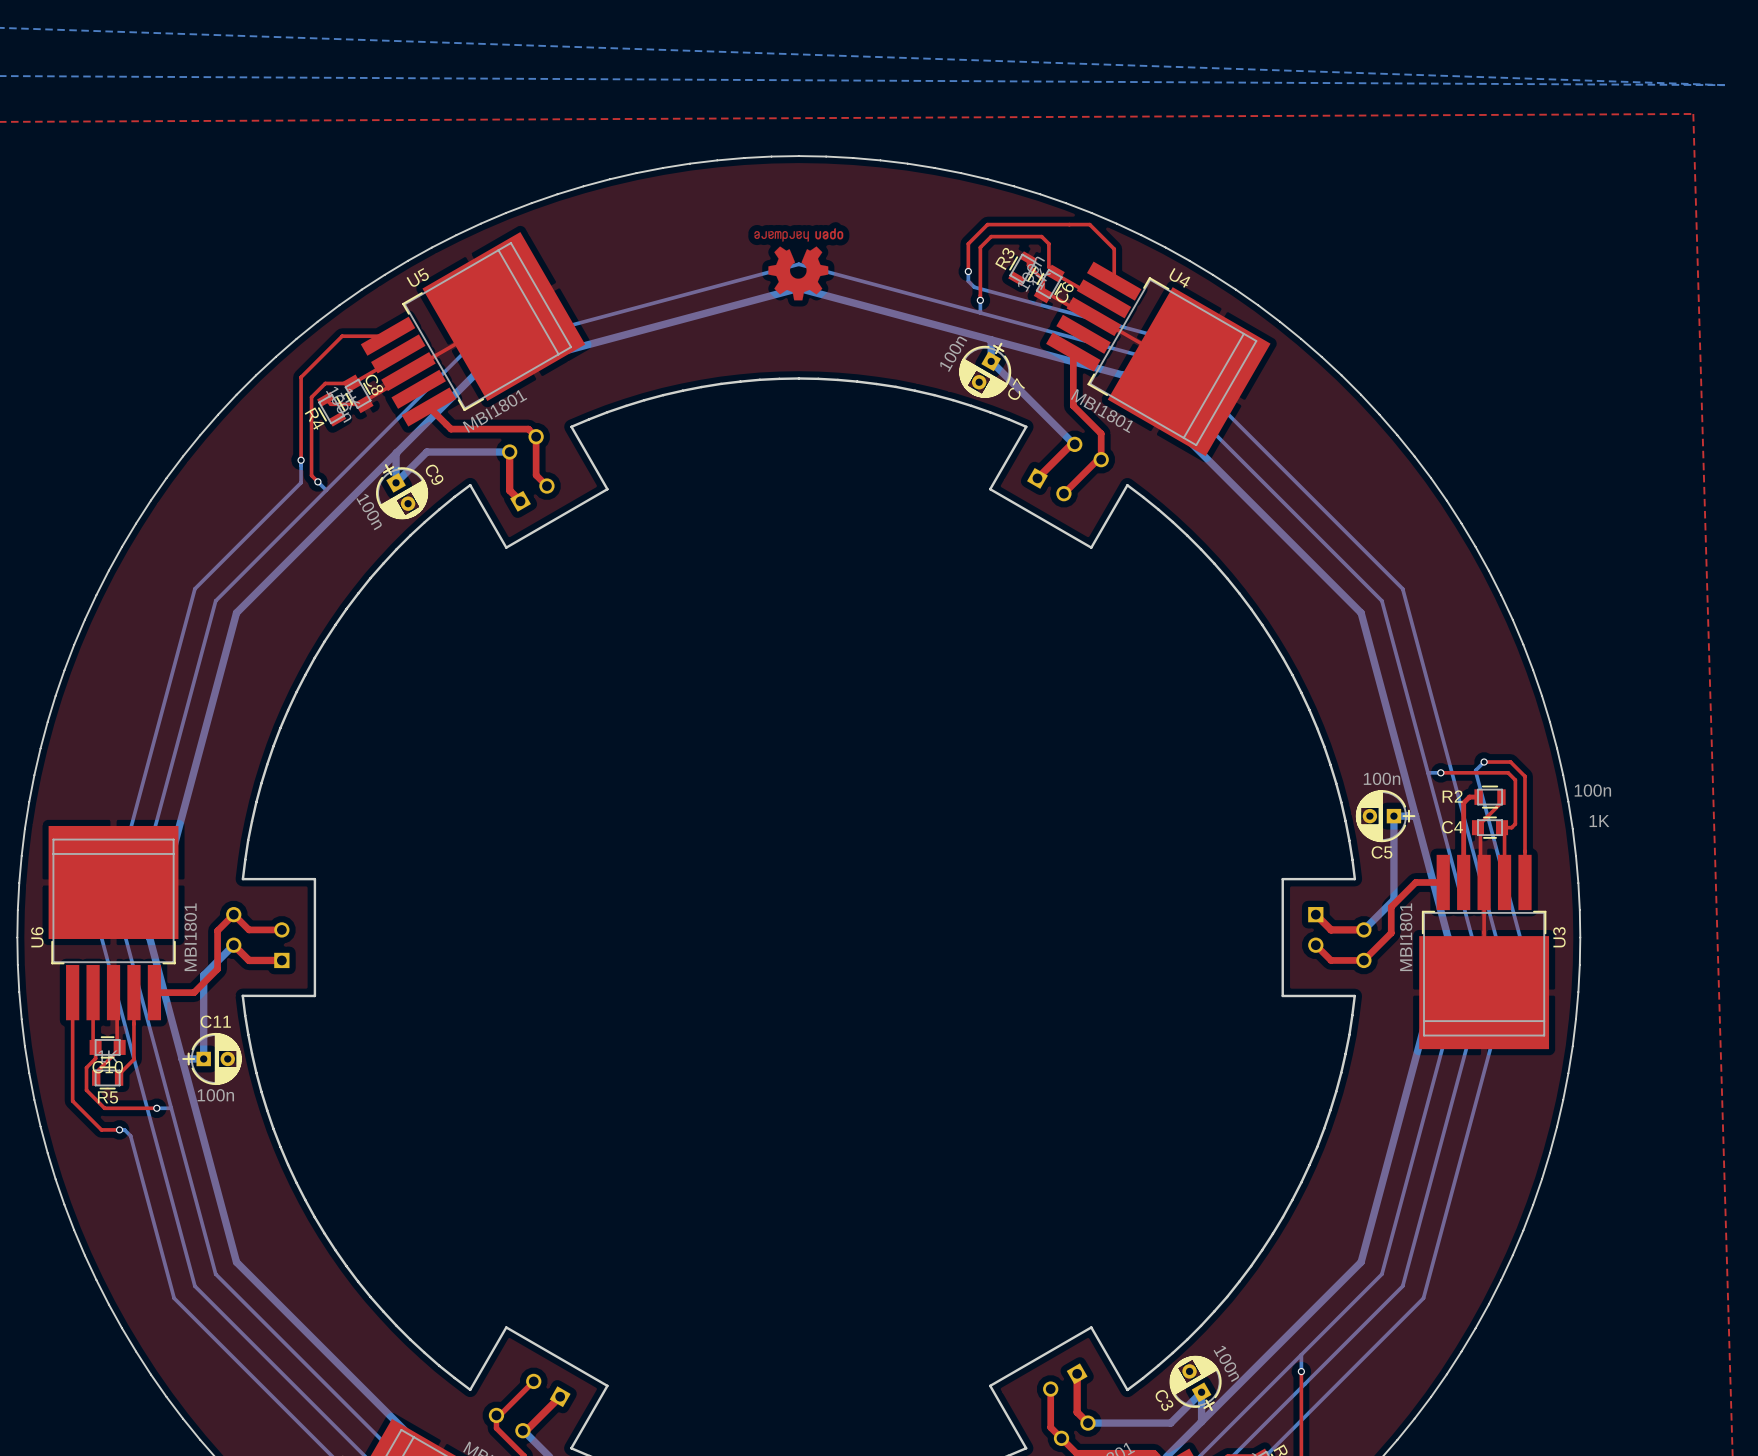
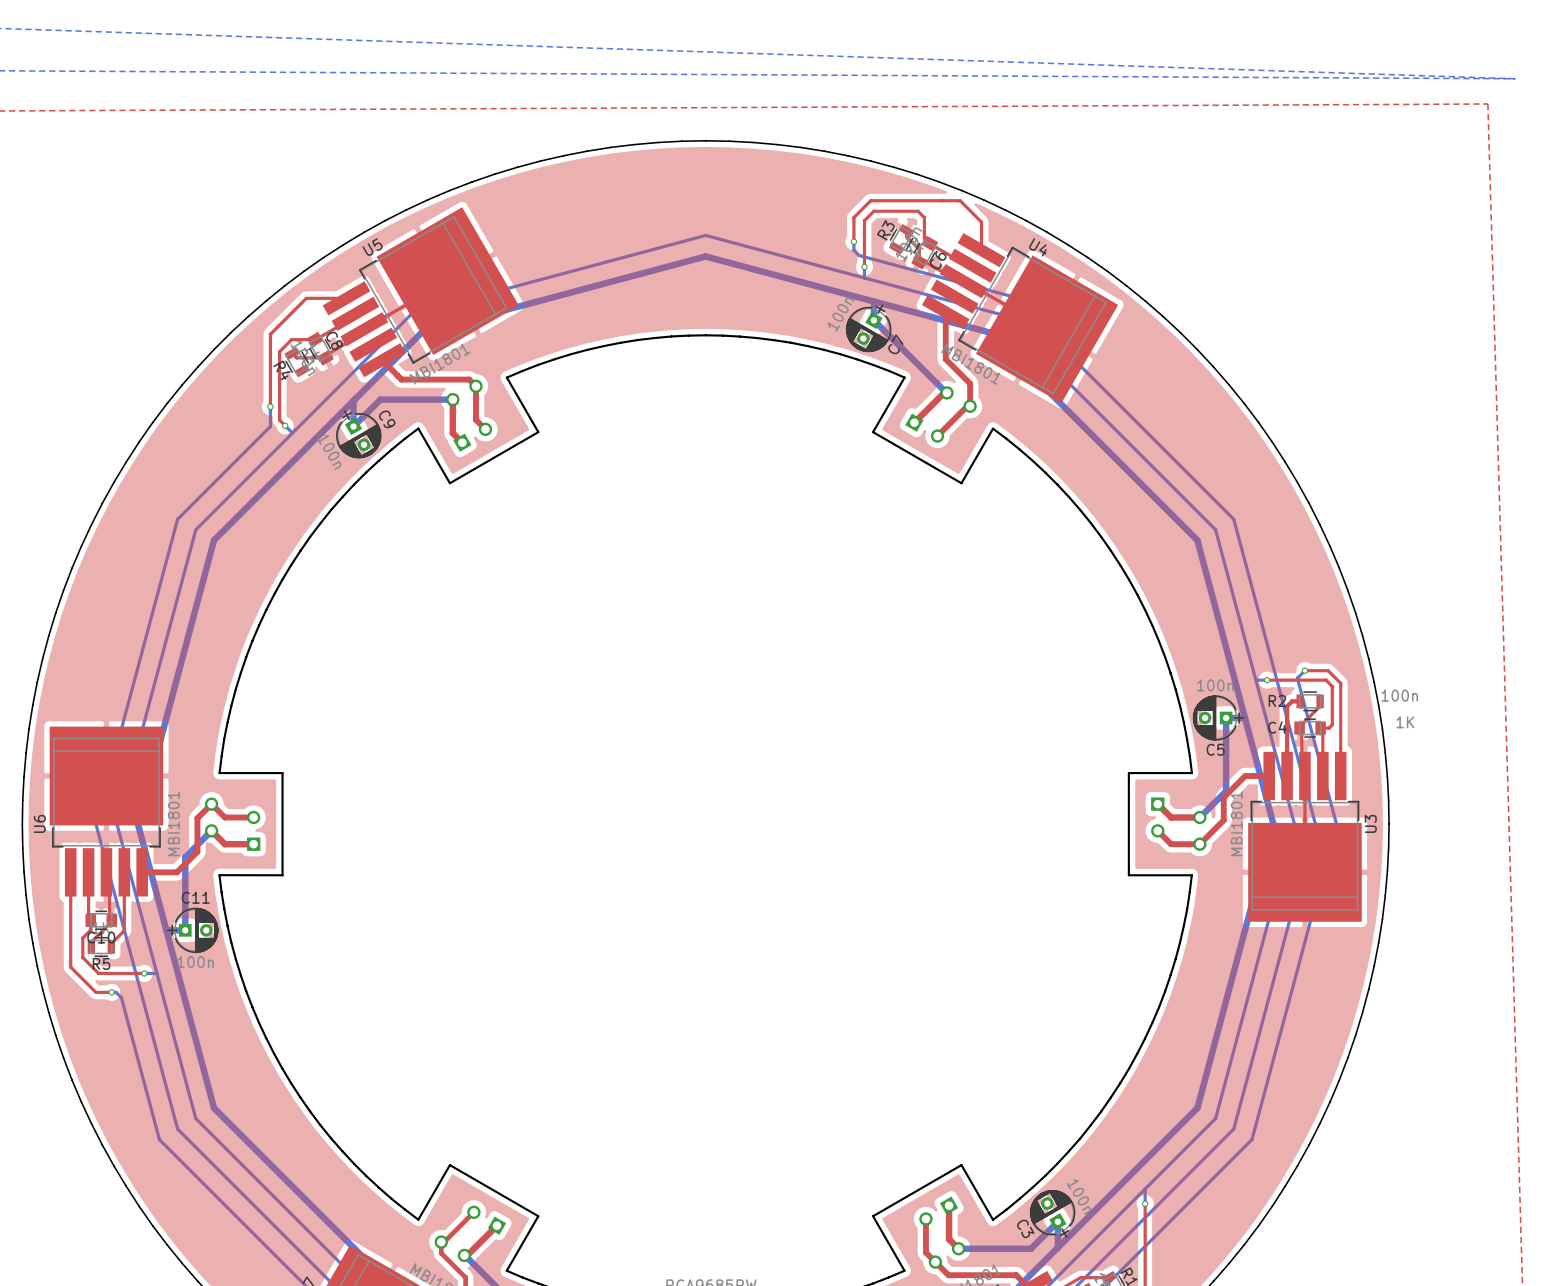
drawing: [754, 228, 844, 301] -> none

